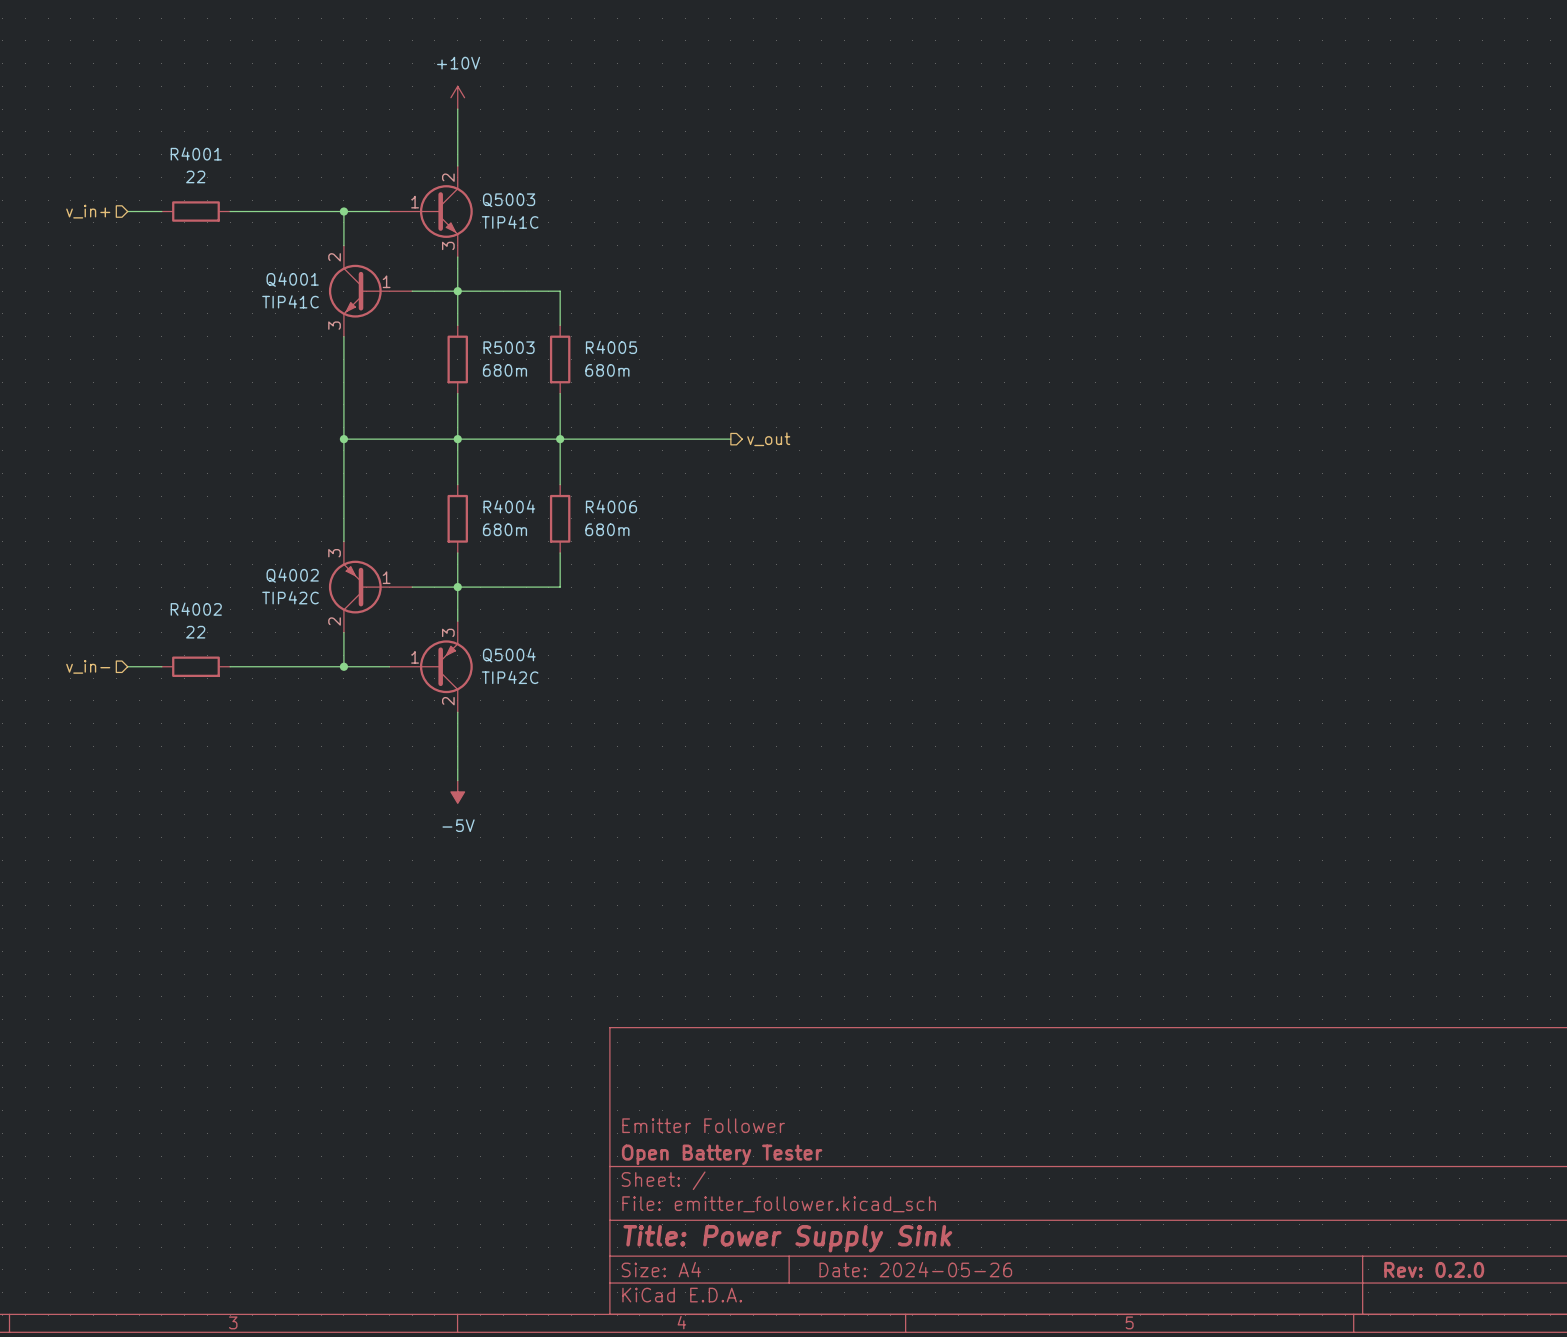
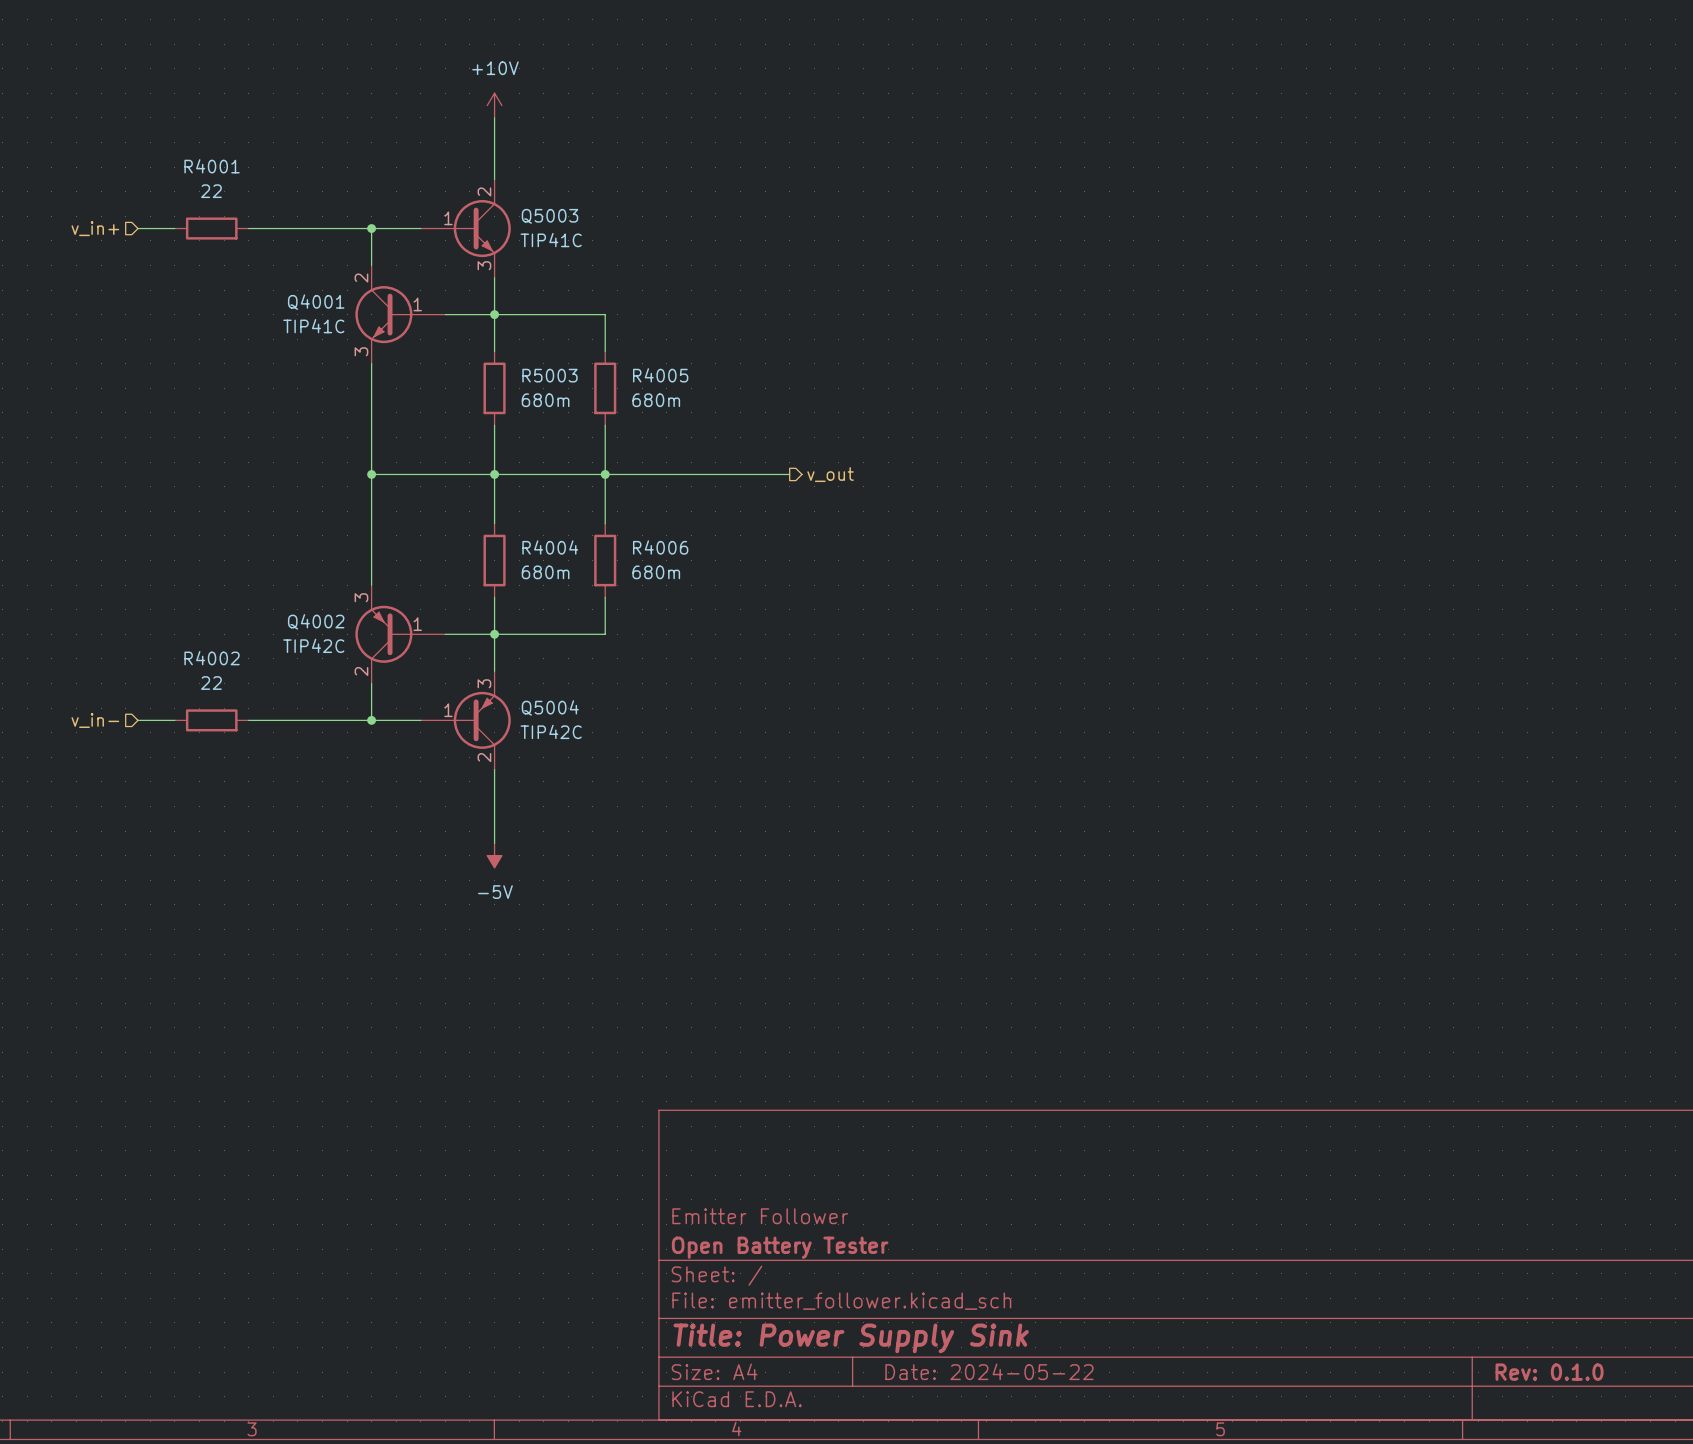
title block: Date: 2024-05-26 (915, 1269) -> Date: 2024-05-22 (989, 1371)
title block: Rev: 0.2.0 (1434, 1269) -> Rev: 0.1.0 (1549, 1372)

